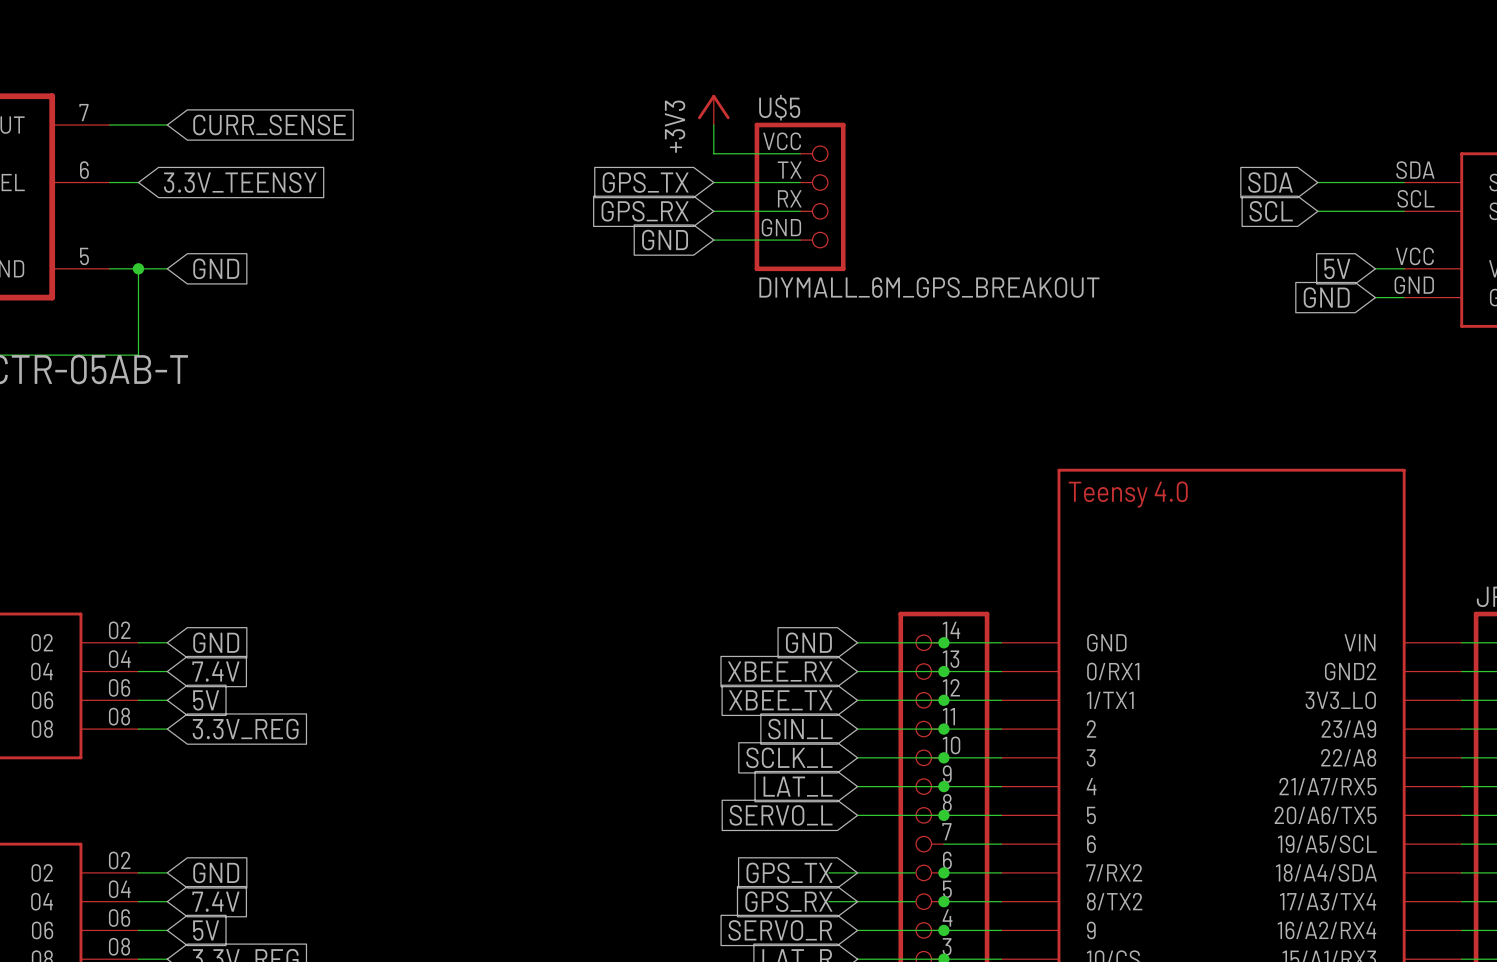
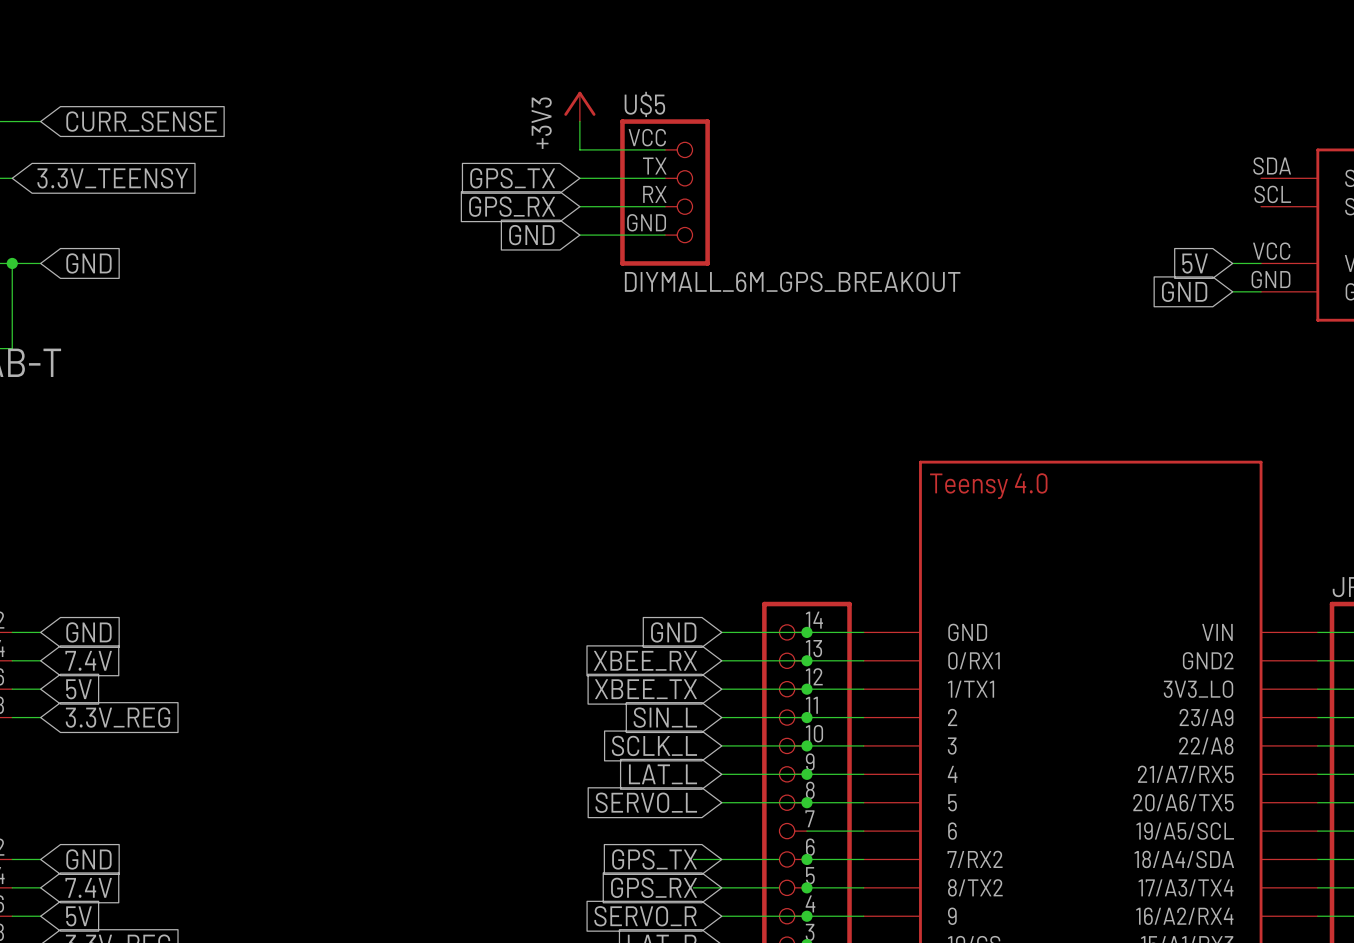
global label: SDA (1270, 182) -> none
wire: (1317, 182) (1404, 182) -> none
global label: SCL (1271, 211) -> none
wire: (1317, 211) (1404, 211) -> none

